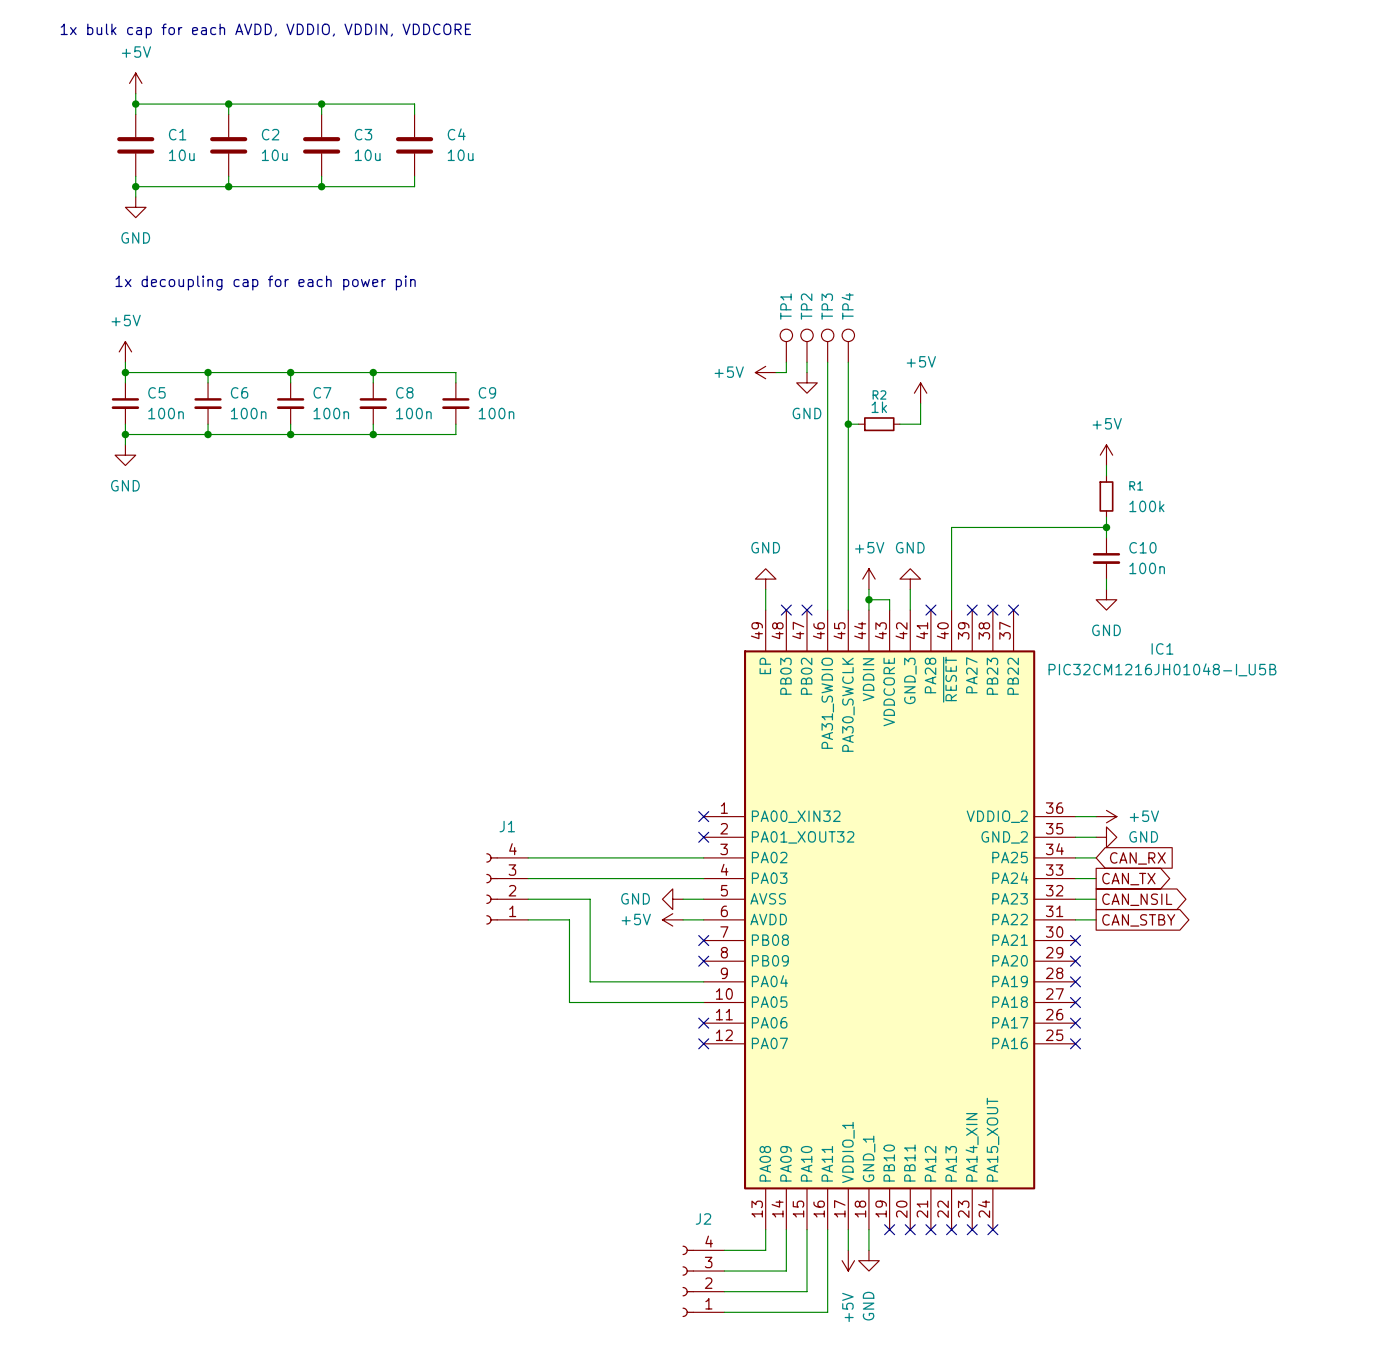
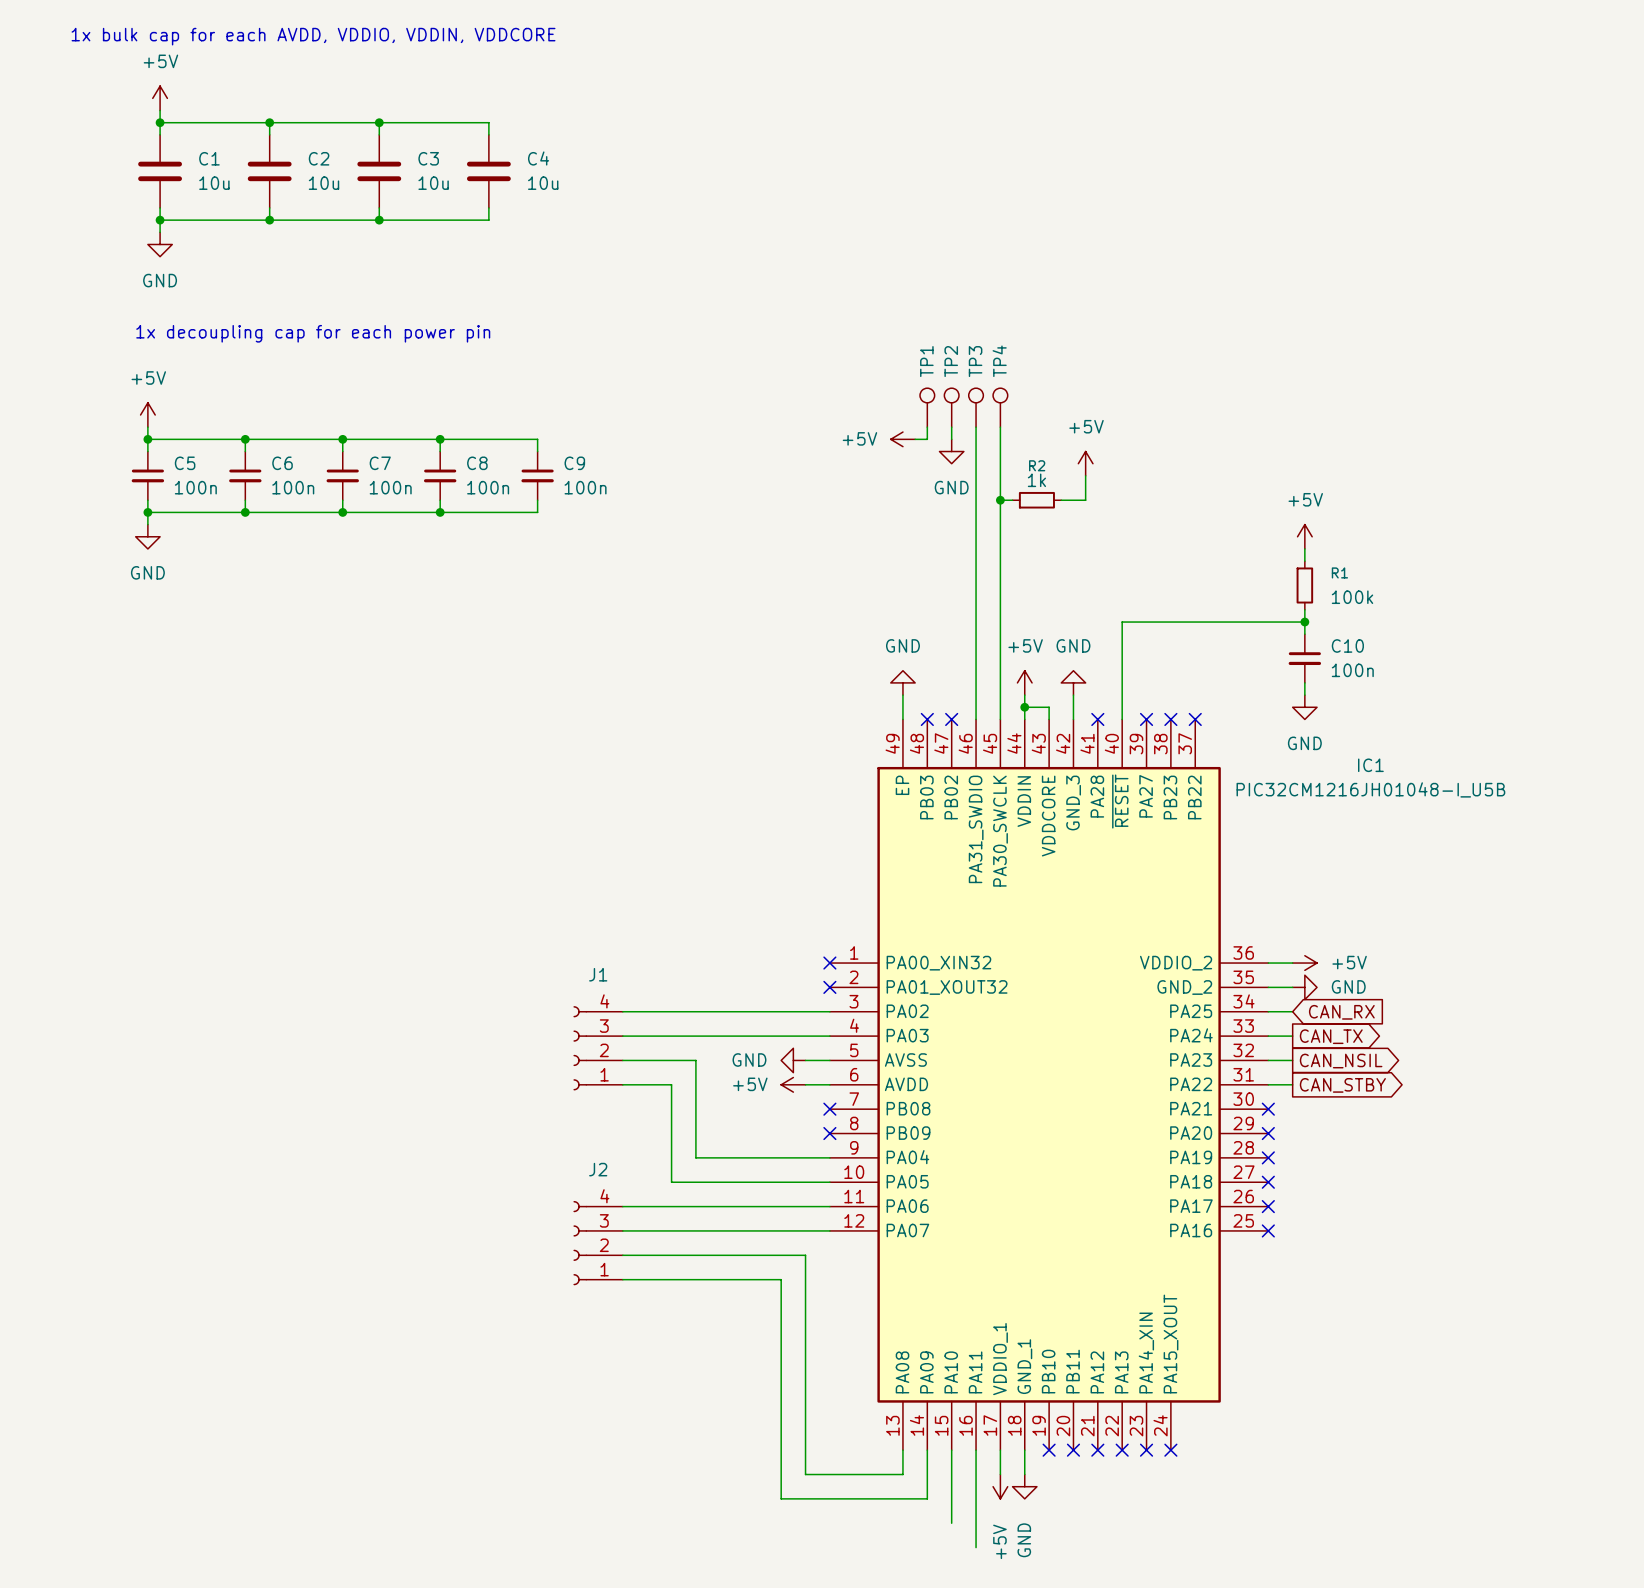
wire: none -> (622, 1206) (829, 1206)
no-connect mark: (703, 1023) -> none
wire: none -> (622, 1230) (829, 1230)
no-connect mark: (703, 1043) -> none
wire: none -> (622, 1255) (805, 1255) (805, 1474) (854, 1474)
wire: none -> (622, 1279) (781, 1279) (781, 1498) (854, 1498)
J2 position: (703, 1281) -> (598, 1243)
wire: (724, 1291) (807, 1291) -> none
wire: (724, 1312) (827, 1312) -> none

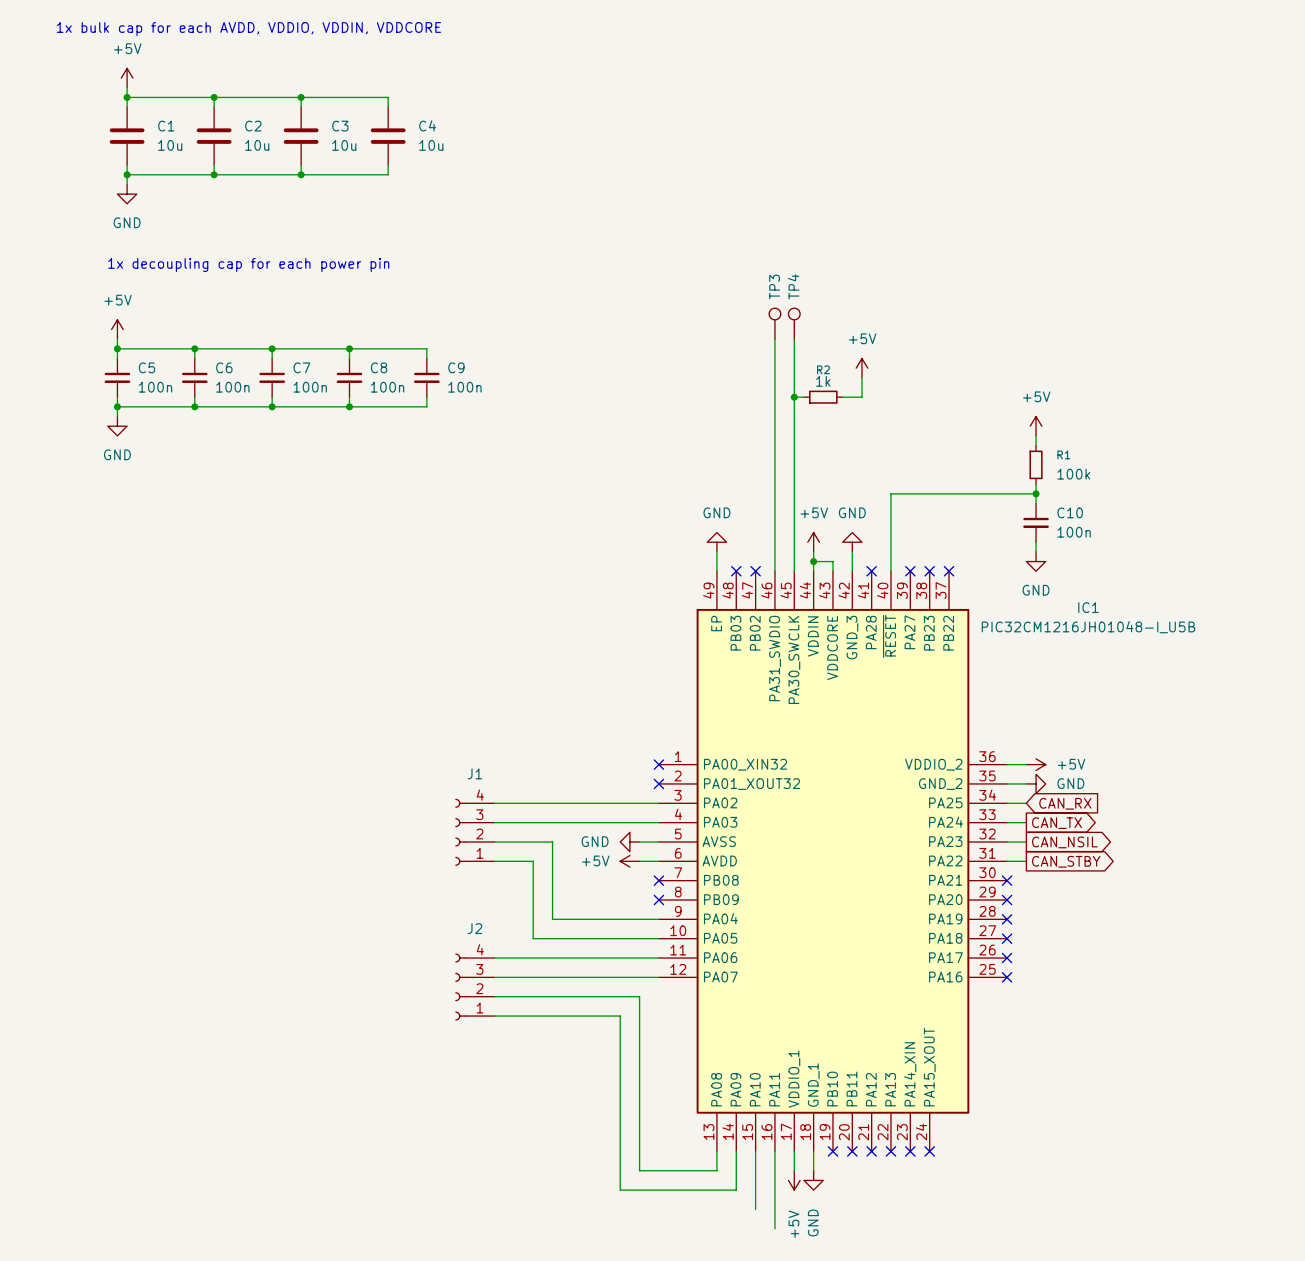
TP1: (927, 407) -> none
TP2: (951, 407) -> none
wire: (927, 427) (927, 439) (915, 439) -> none
wire: (951, 427) (951, 439) -> none
power symbol: +5V (902, 439) -> none
power symbol: GND (951, 451) -> none

